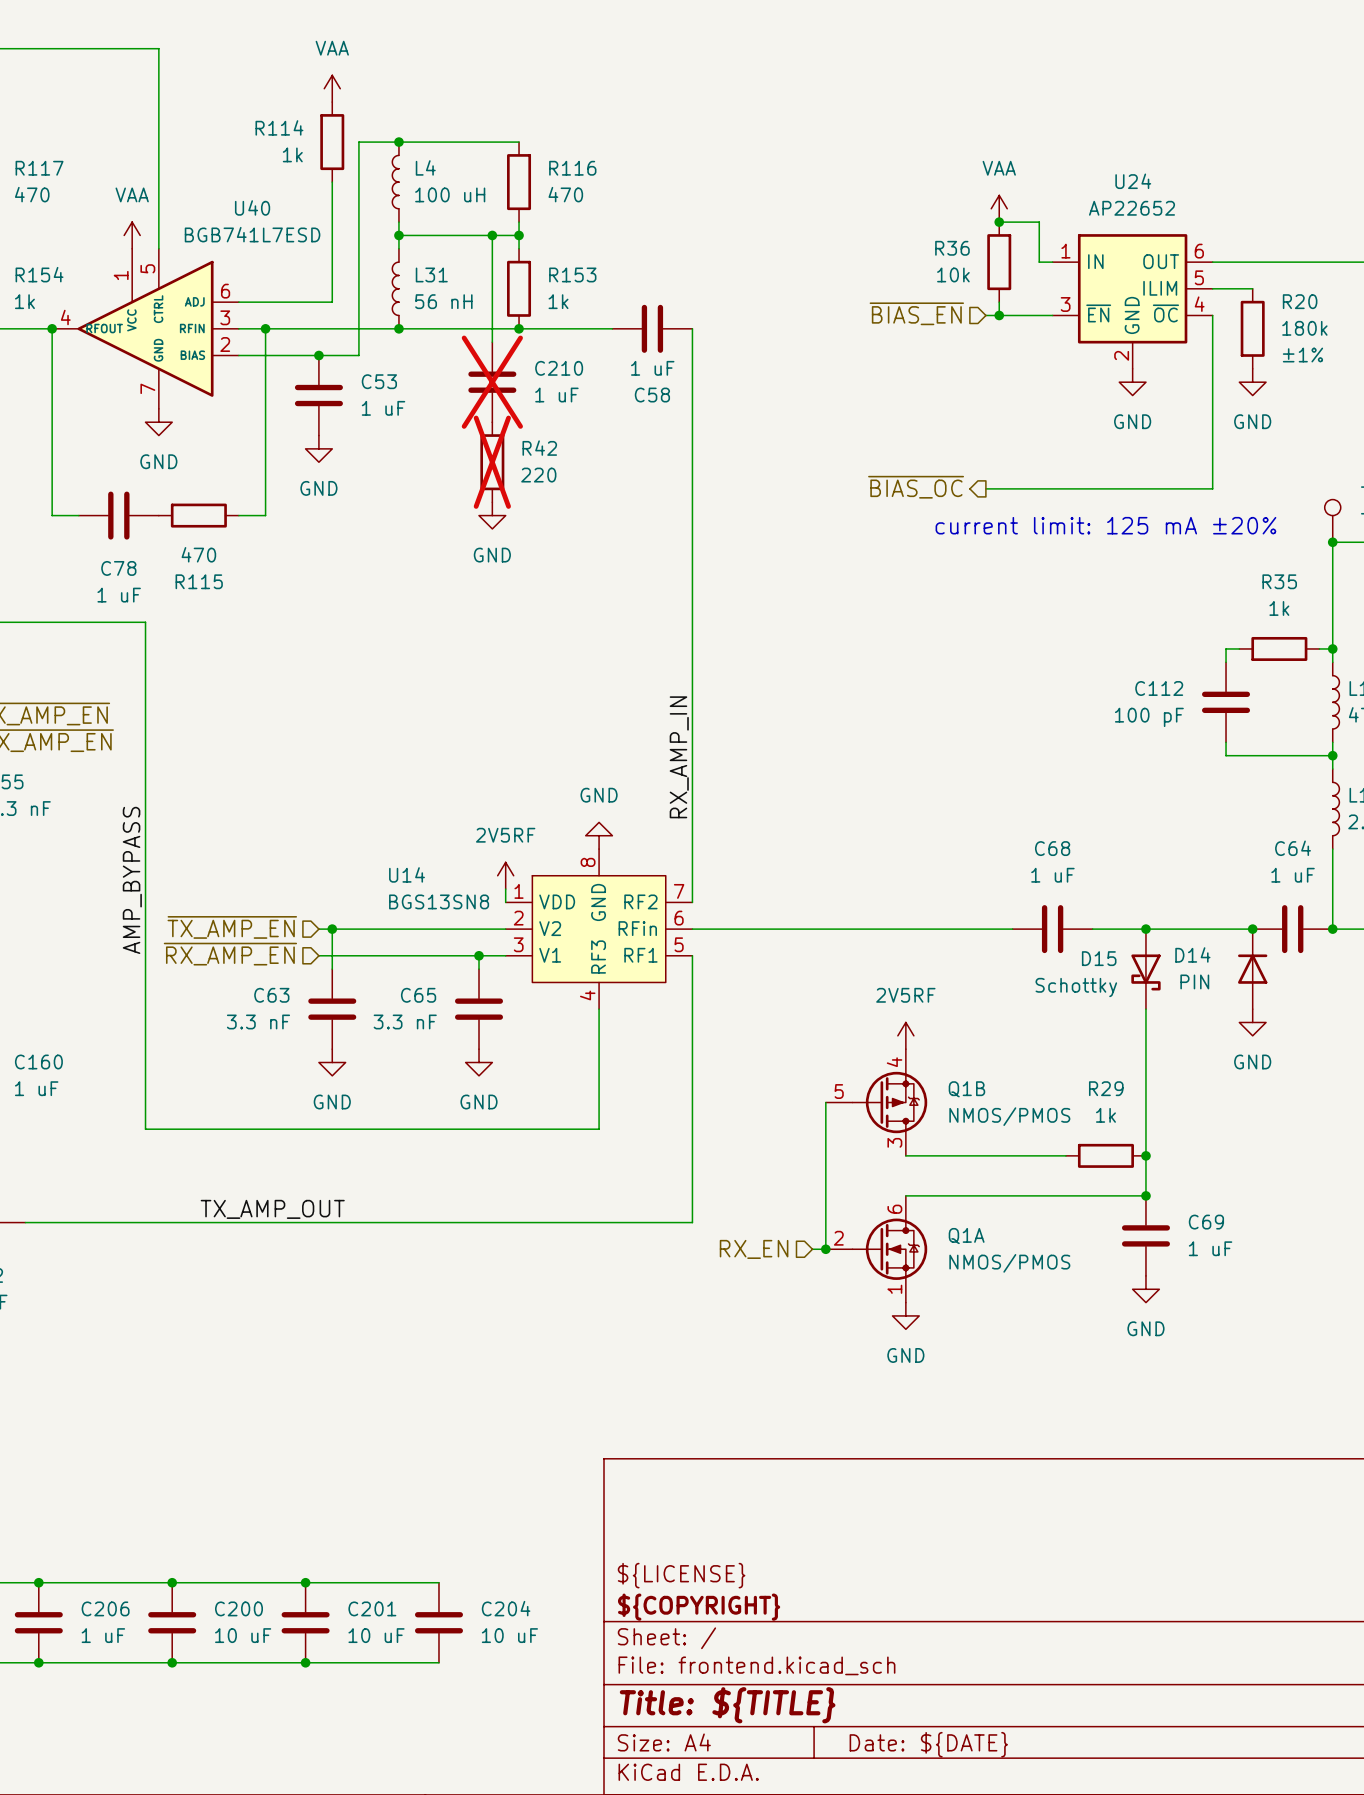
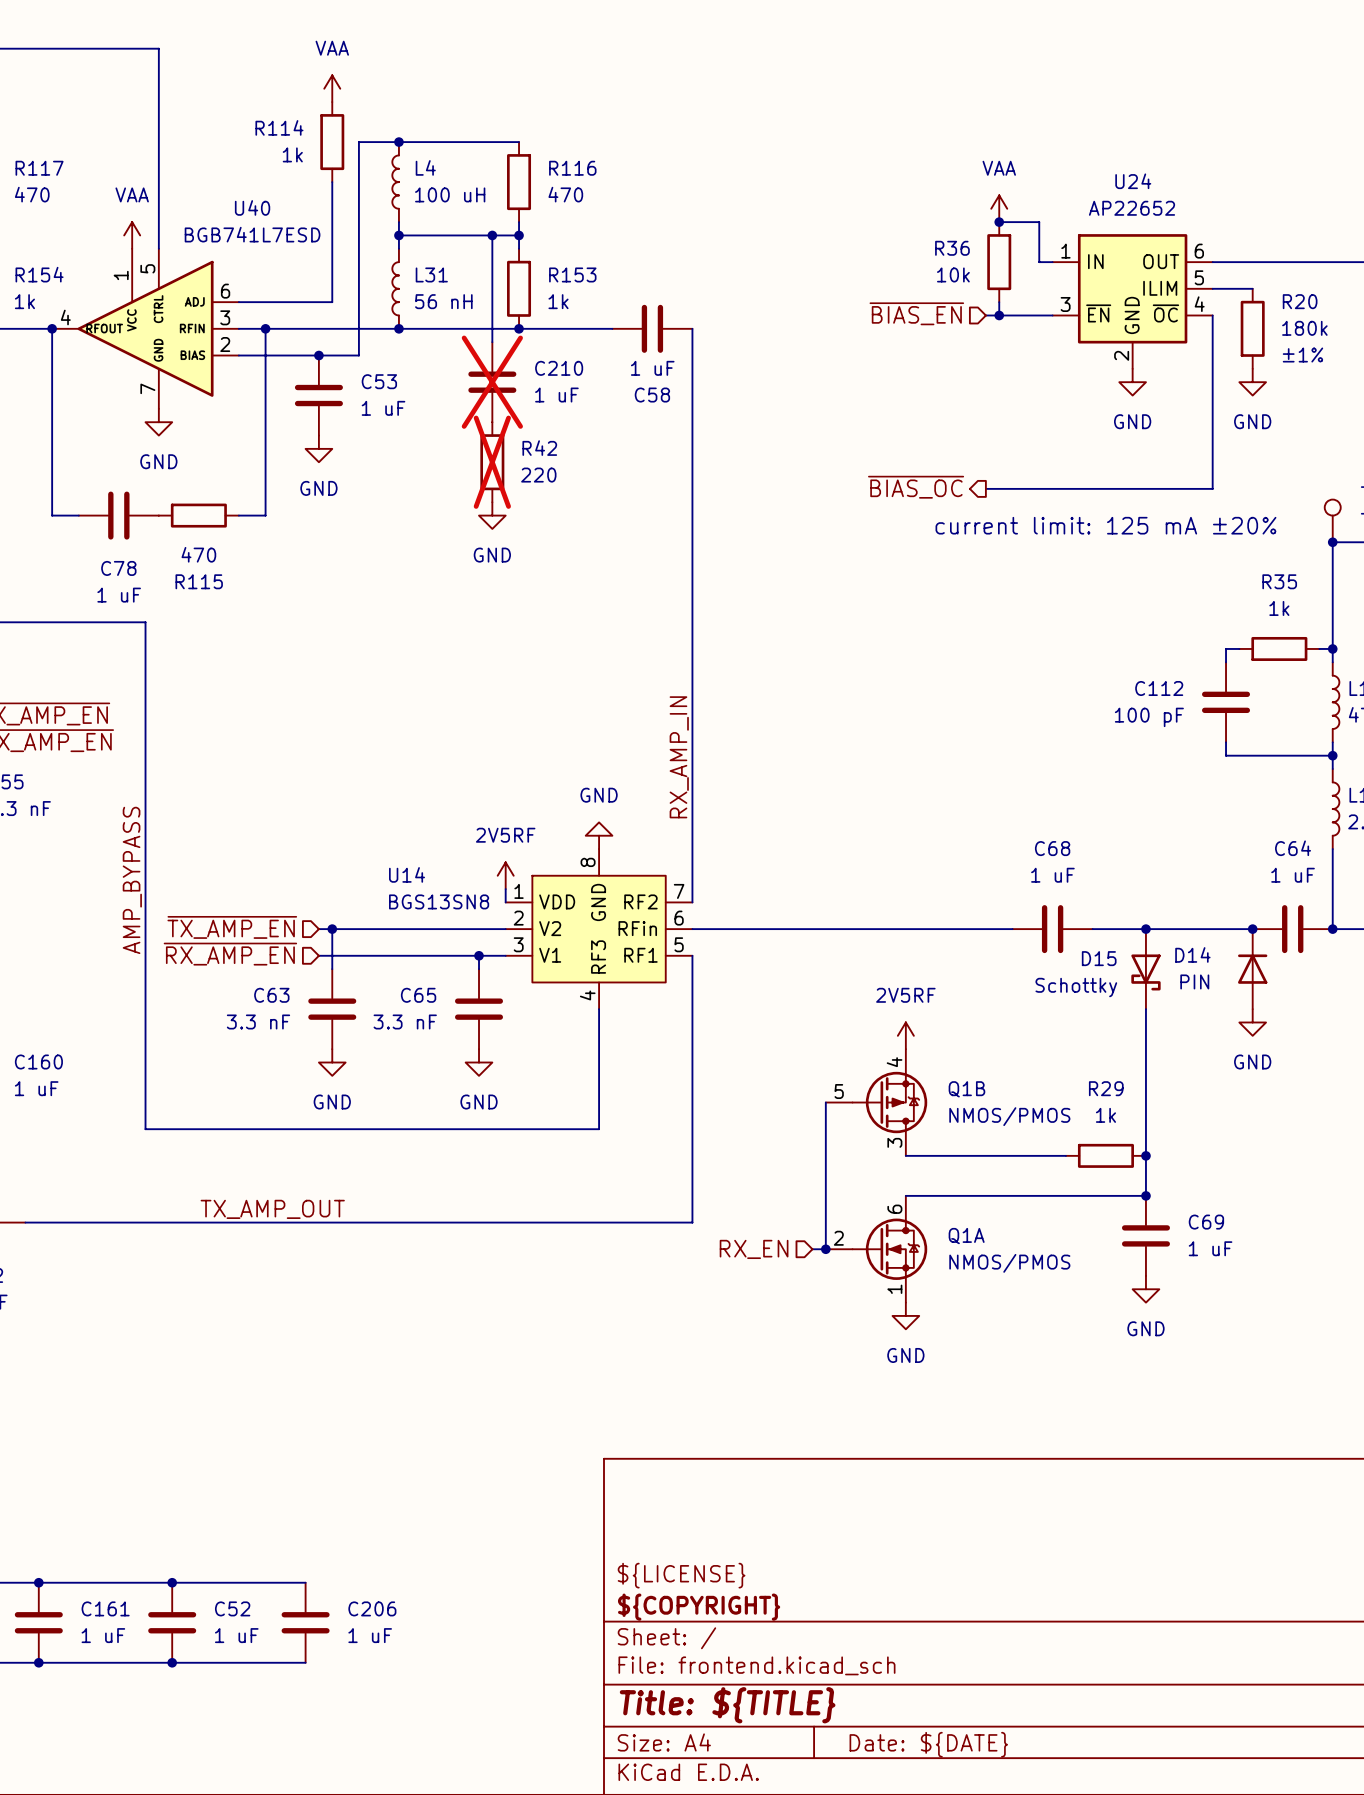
wire: (305, 1582) (438, 1582) -> none
junction: (305, 1582) -> none
C206 name: C206 (105, 1608) -> C161 (105, 1608)
C200 name: C200 (238, 1608) -> C52 (232, 1608)
C201 name: C201 (372, 1608) -> C206 (372, 1608)
C204: 10 uF (438, 1622) -> none
C200 value: 10 uF (243, 1635) -> 1 uF (236, 1635)
C201 value: 10 uF (376, 1635) -> 1 uF (370, 1635)
wire: (305, 1662) (438, 1662) -> none
junction: (305, 1662) -> none

